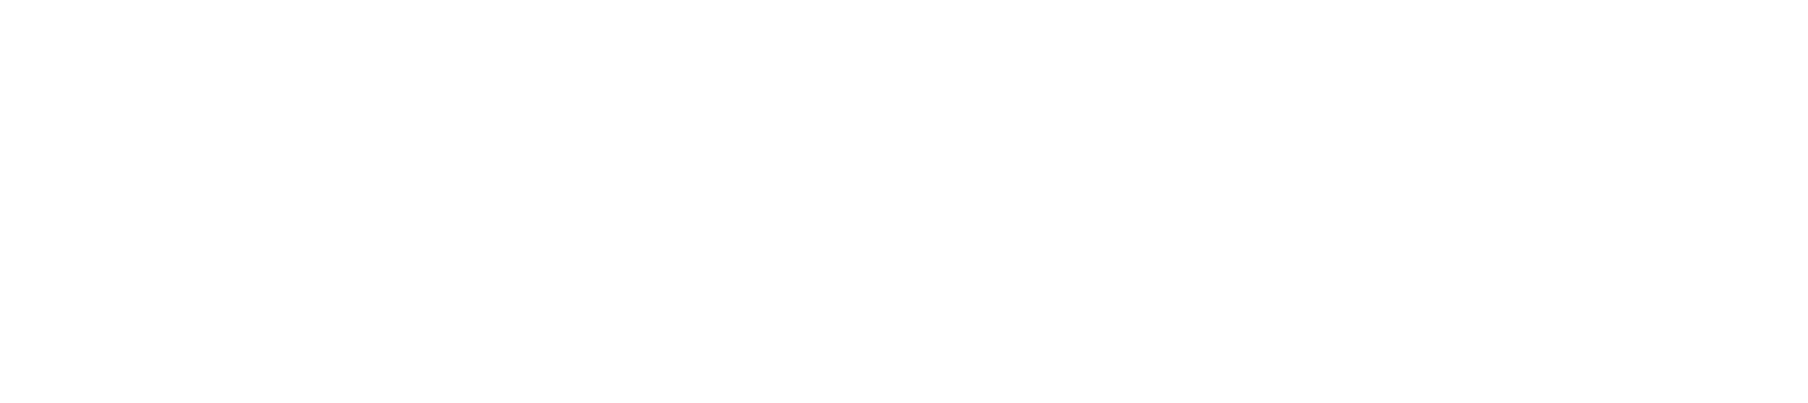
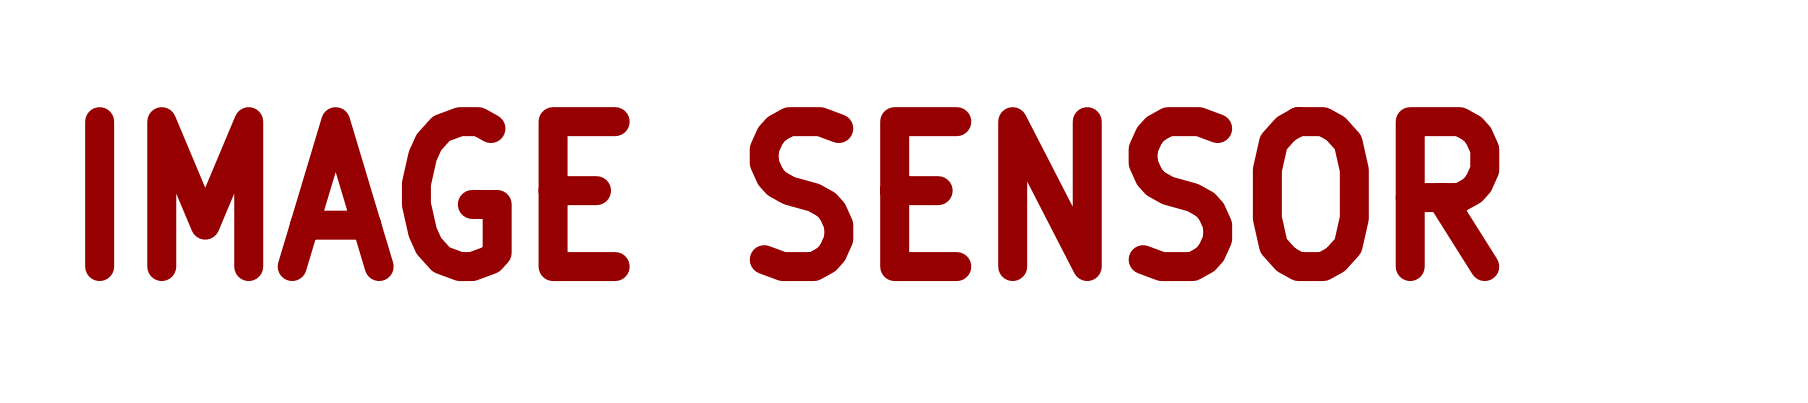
text: none -> IMAGE SENSOR (792, 194)

